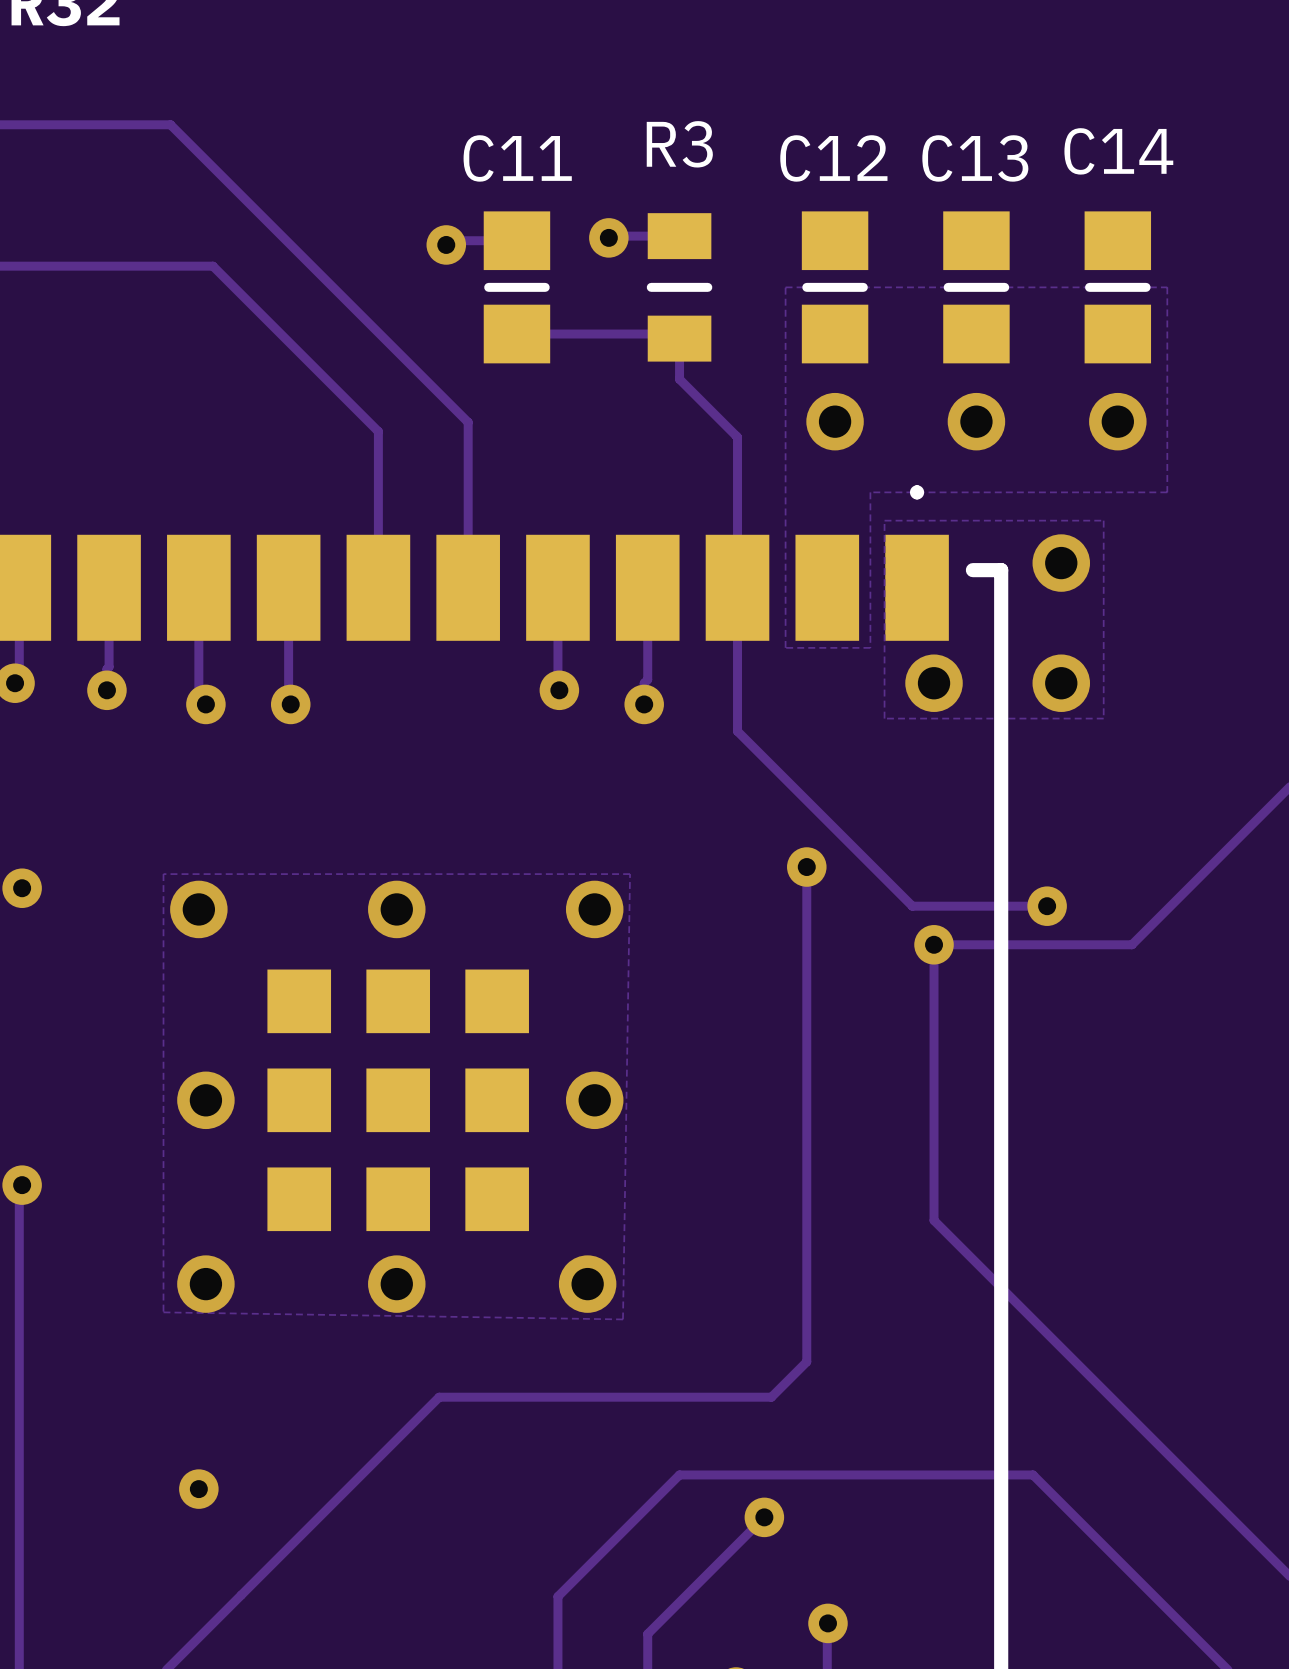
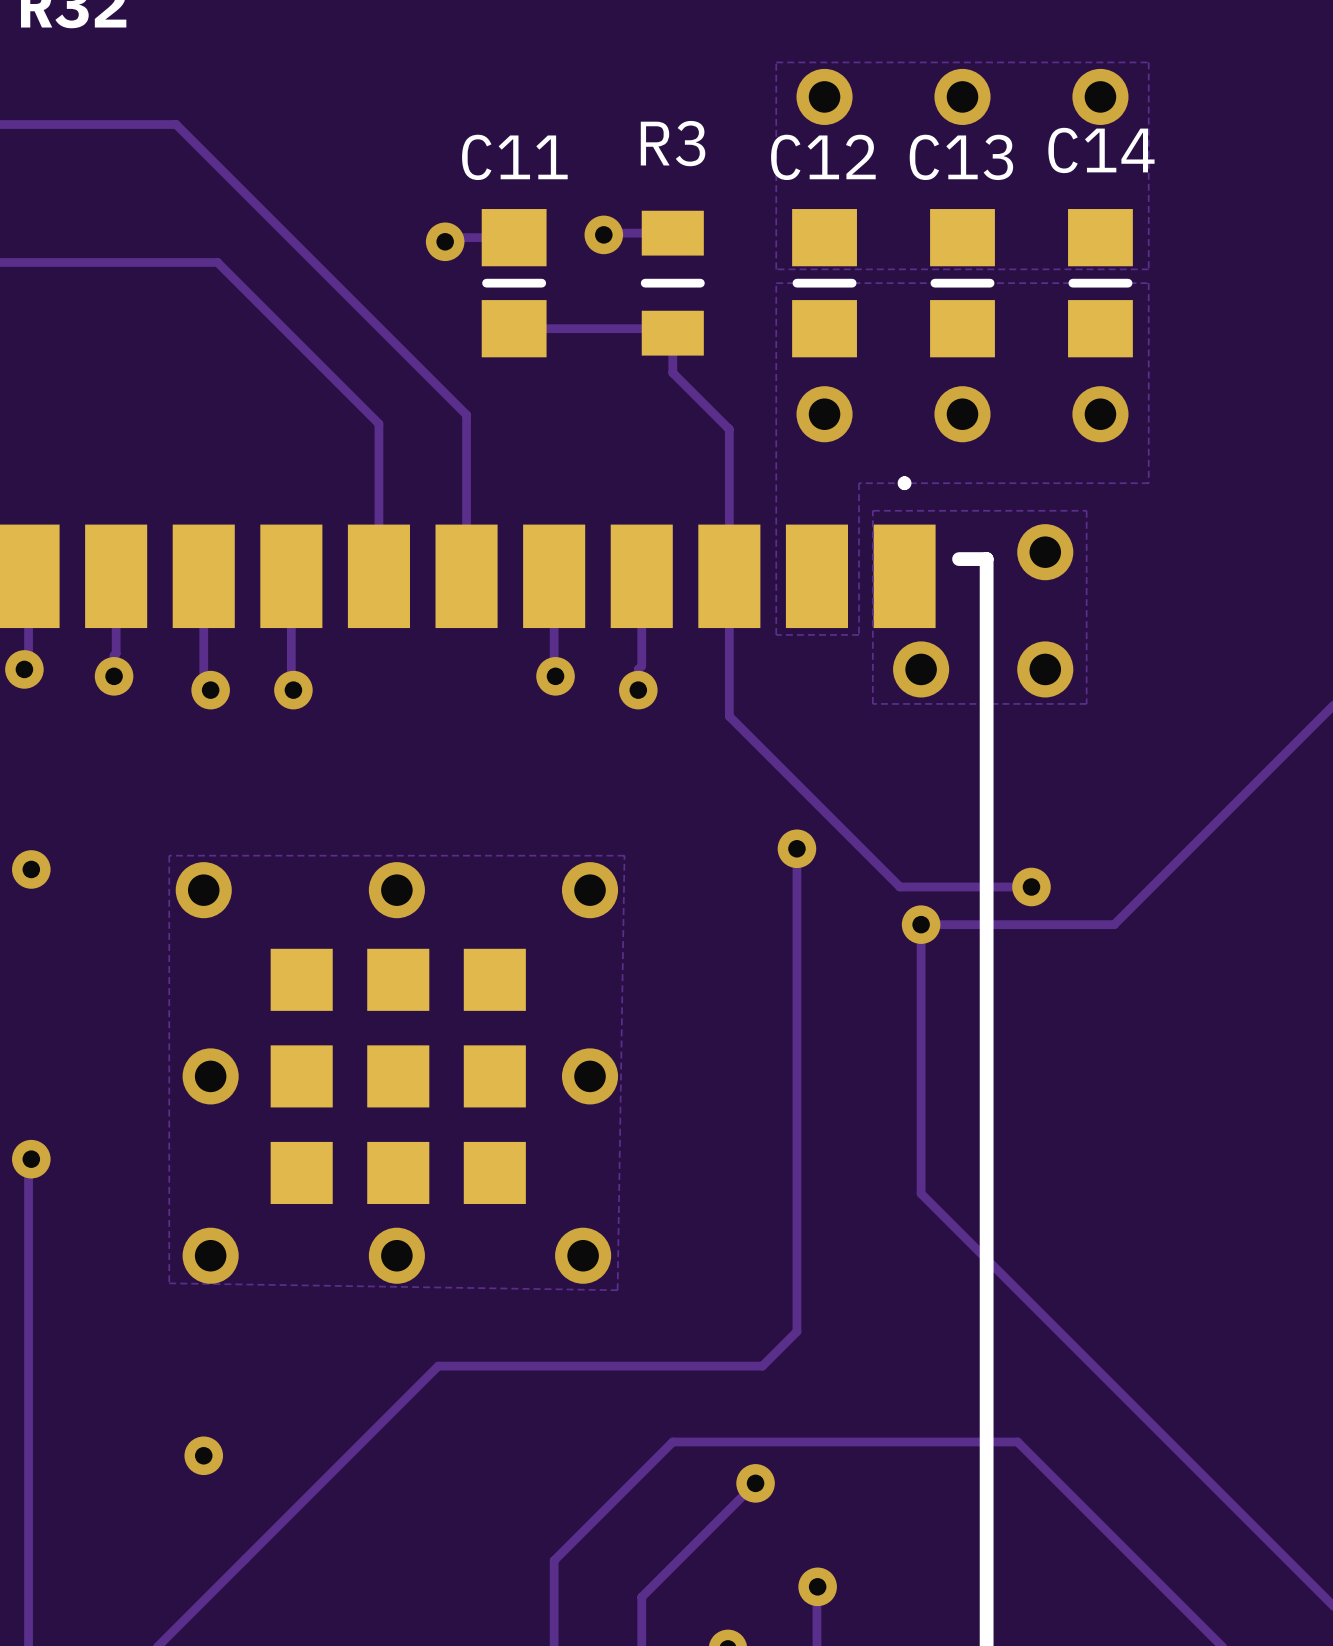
zone outline: none -> (776, 62) (776, 269) (1148, 269) (1148, 62) (776, 62)
via: none -> (824, 96)
via: none -> (962, 96)
via: none -> (1100, 96)

